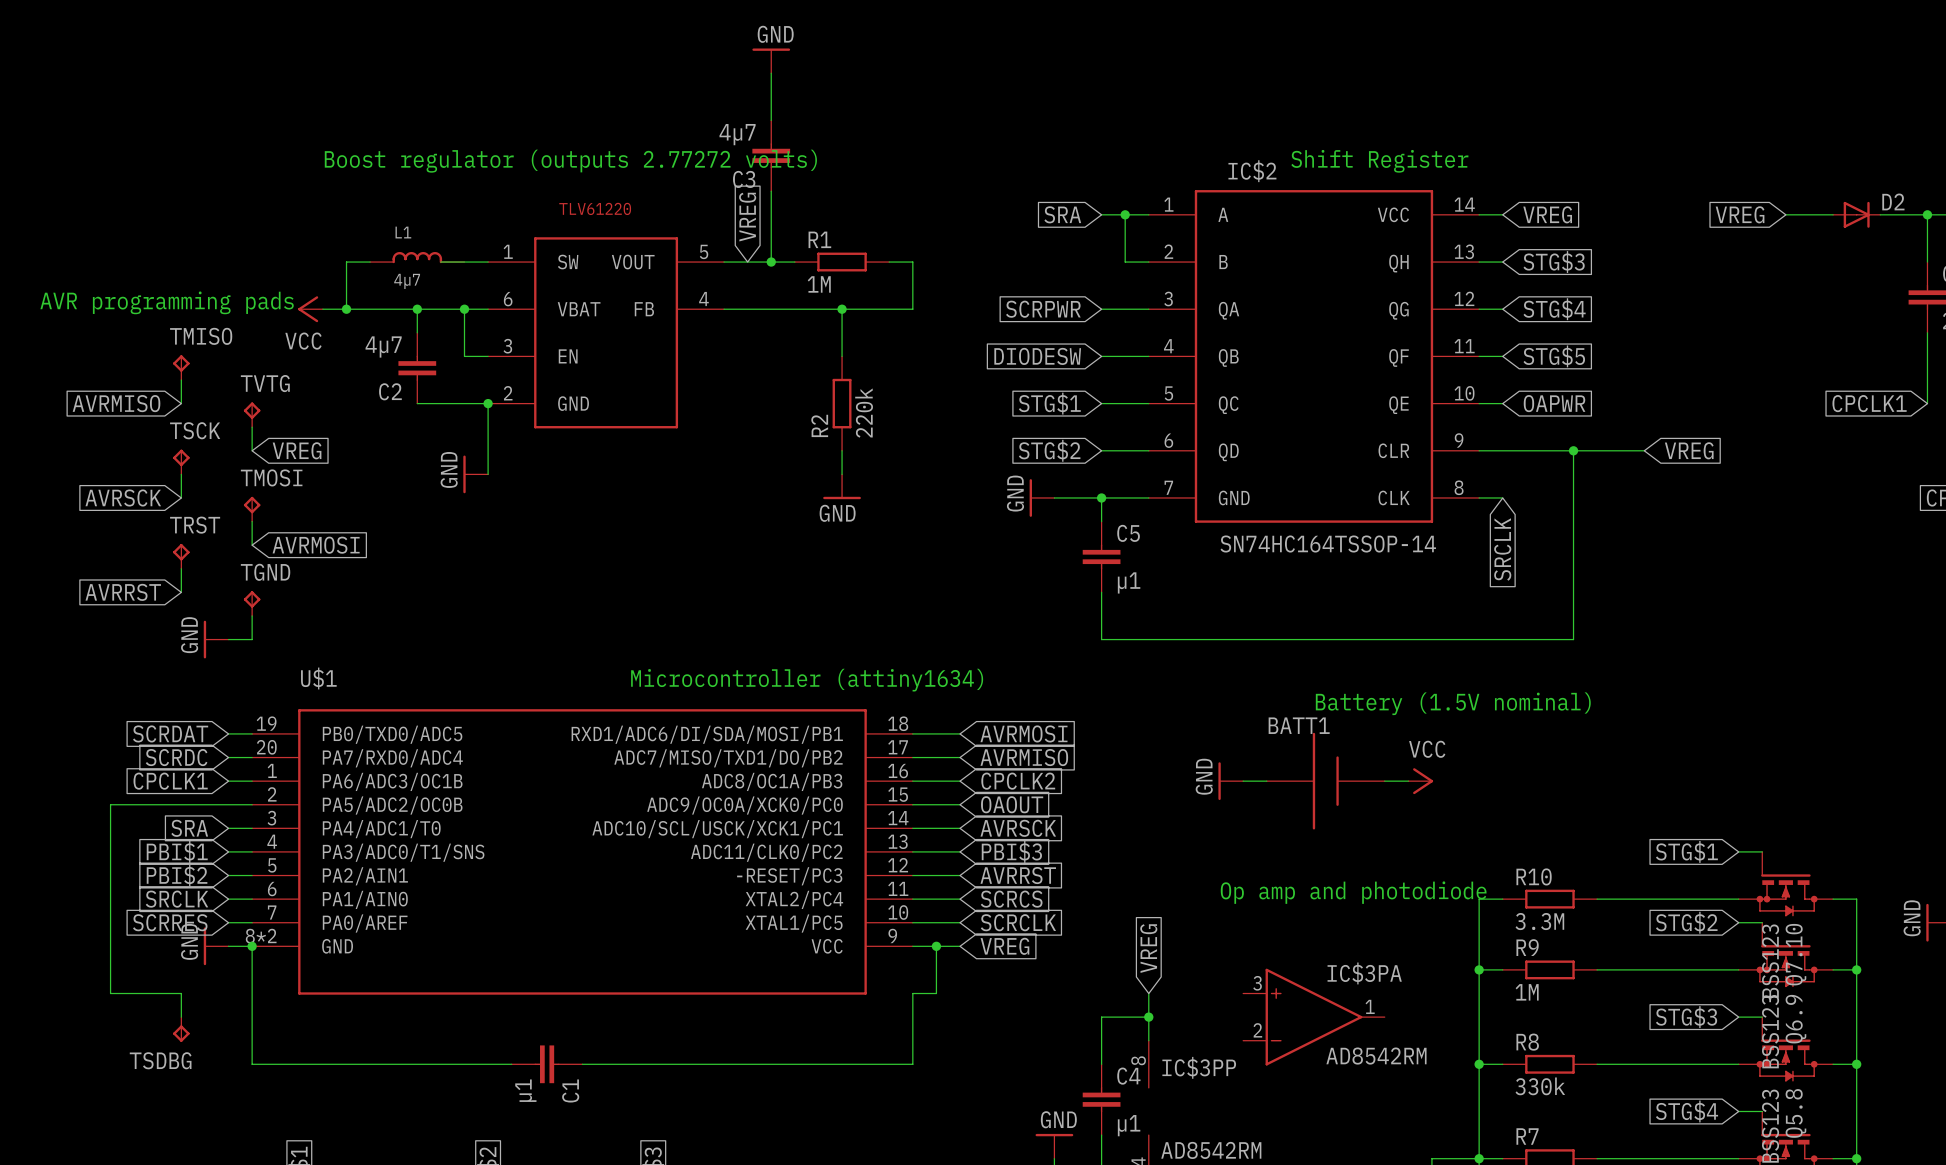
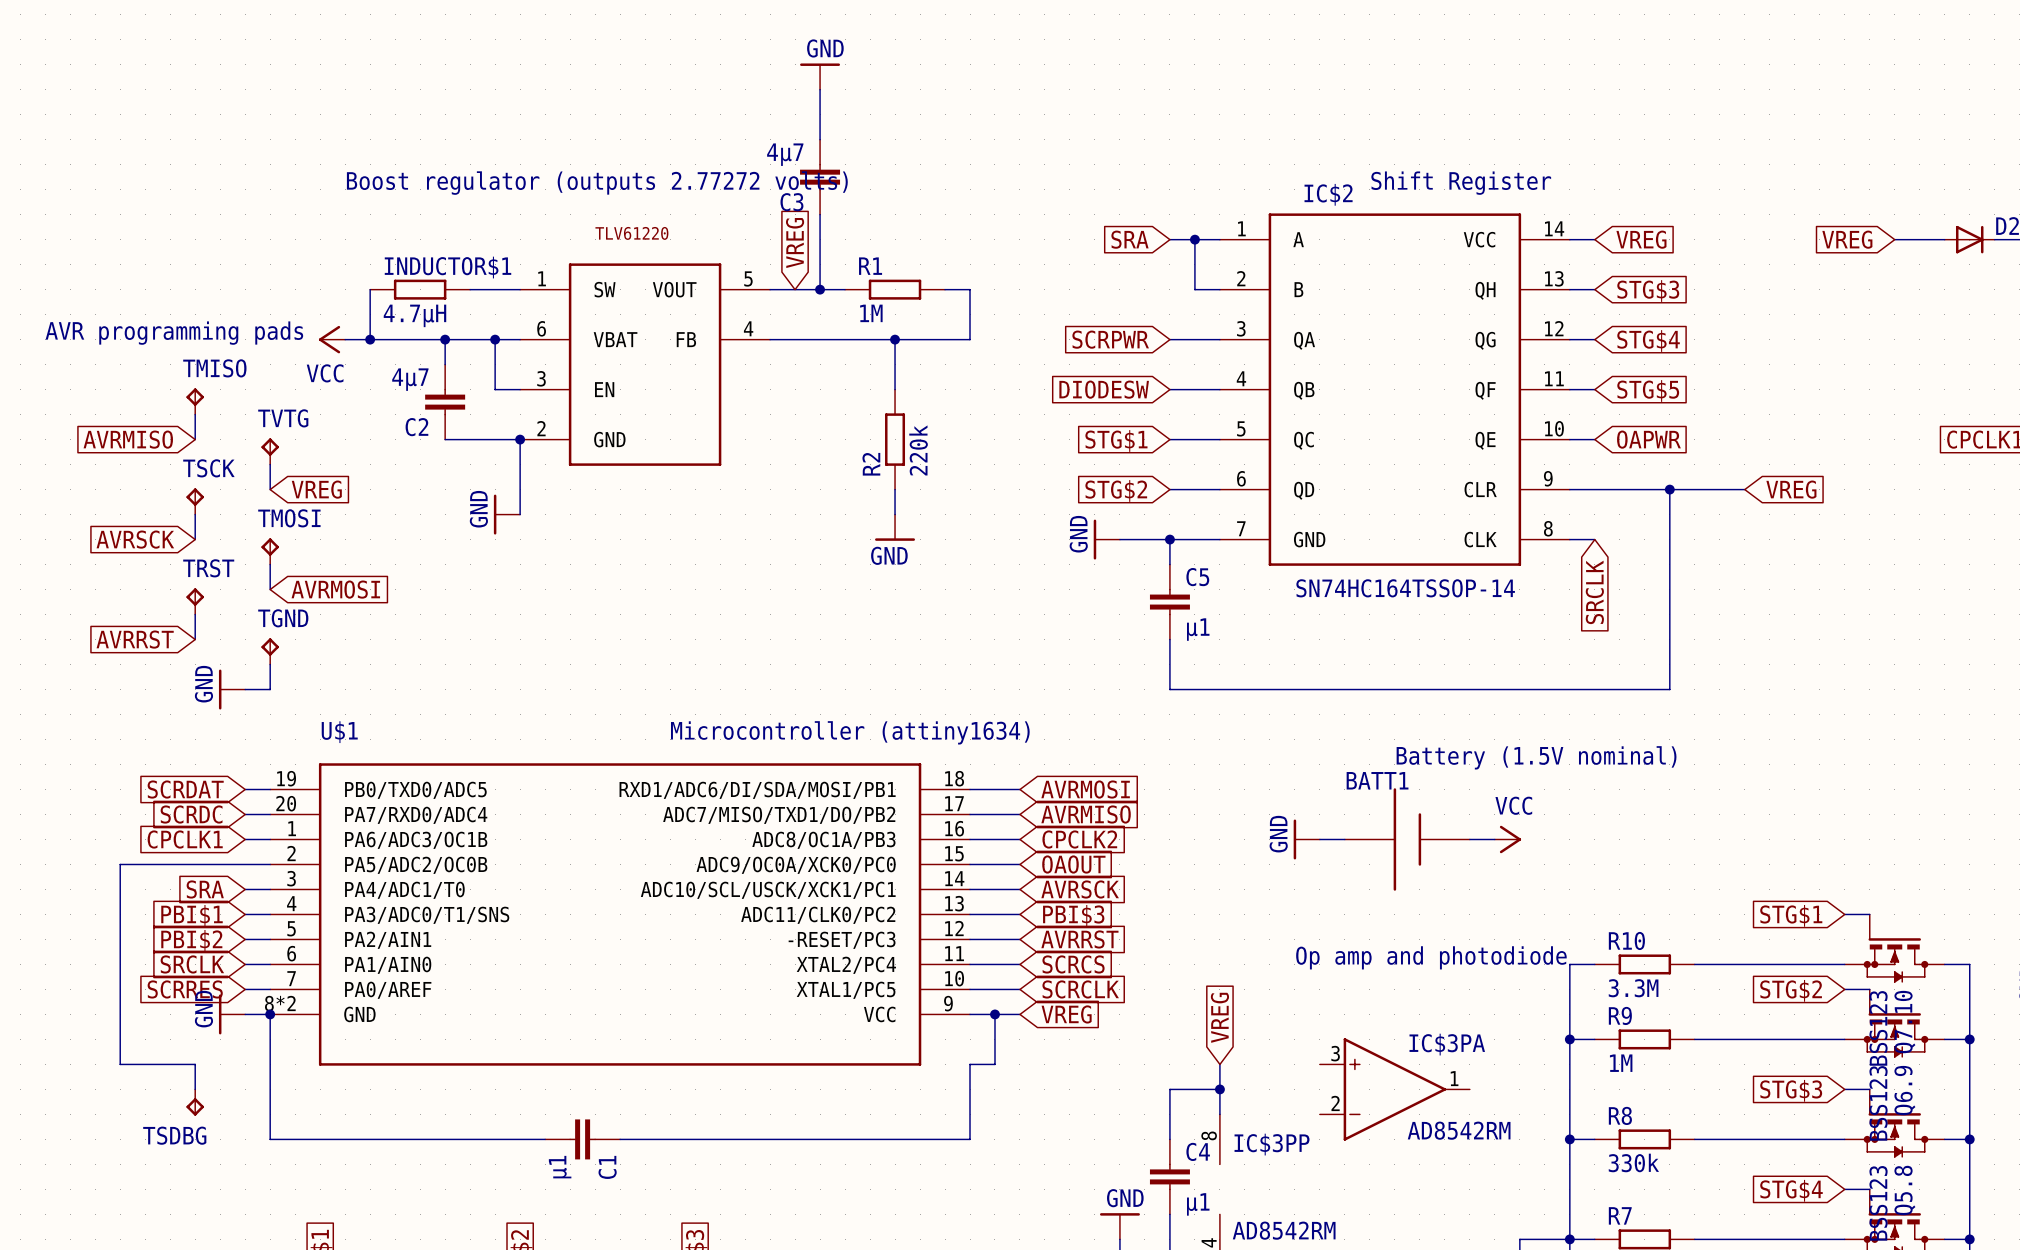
L1: 4µ7 (417, 257) -> none
INDUCTOR$1: none -> 4.7µH (420, 289)

